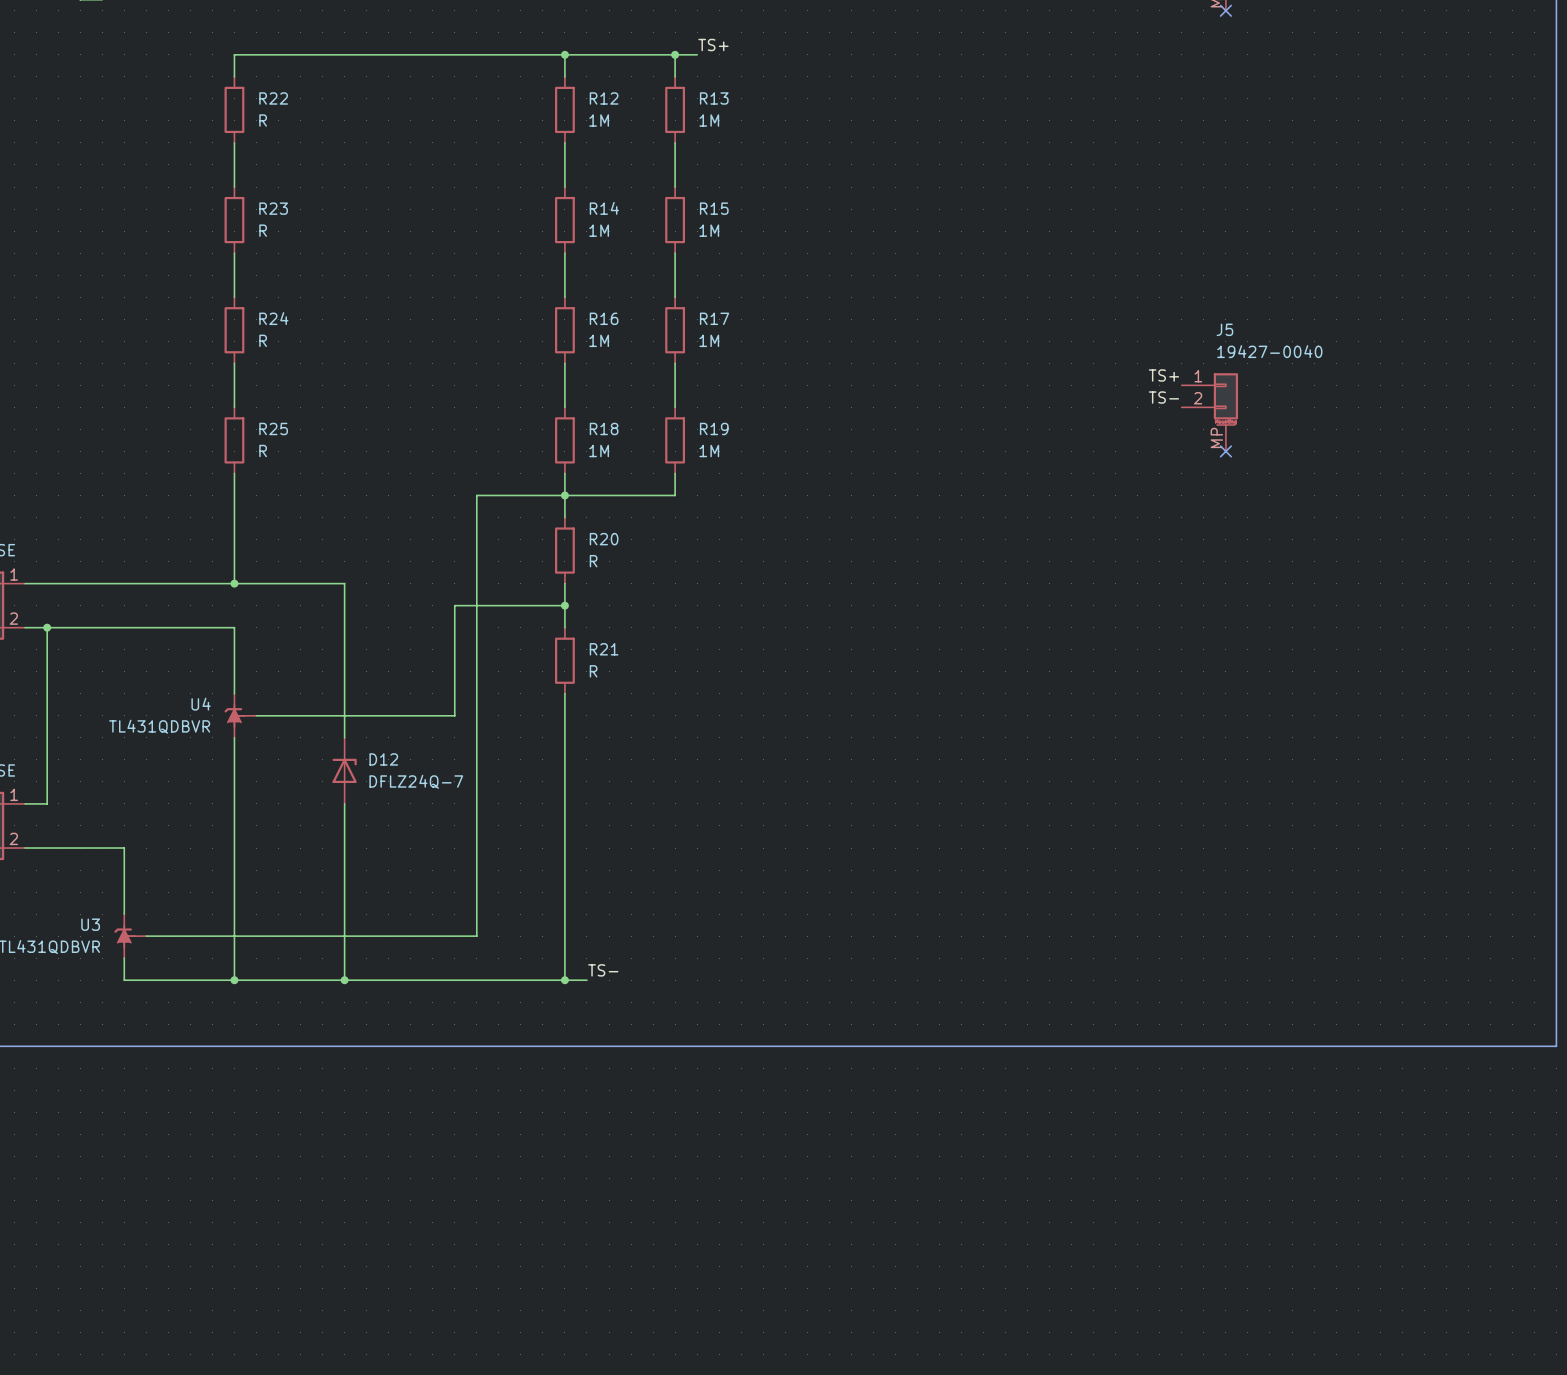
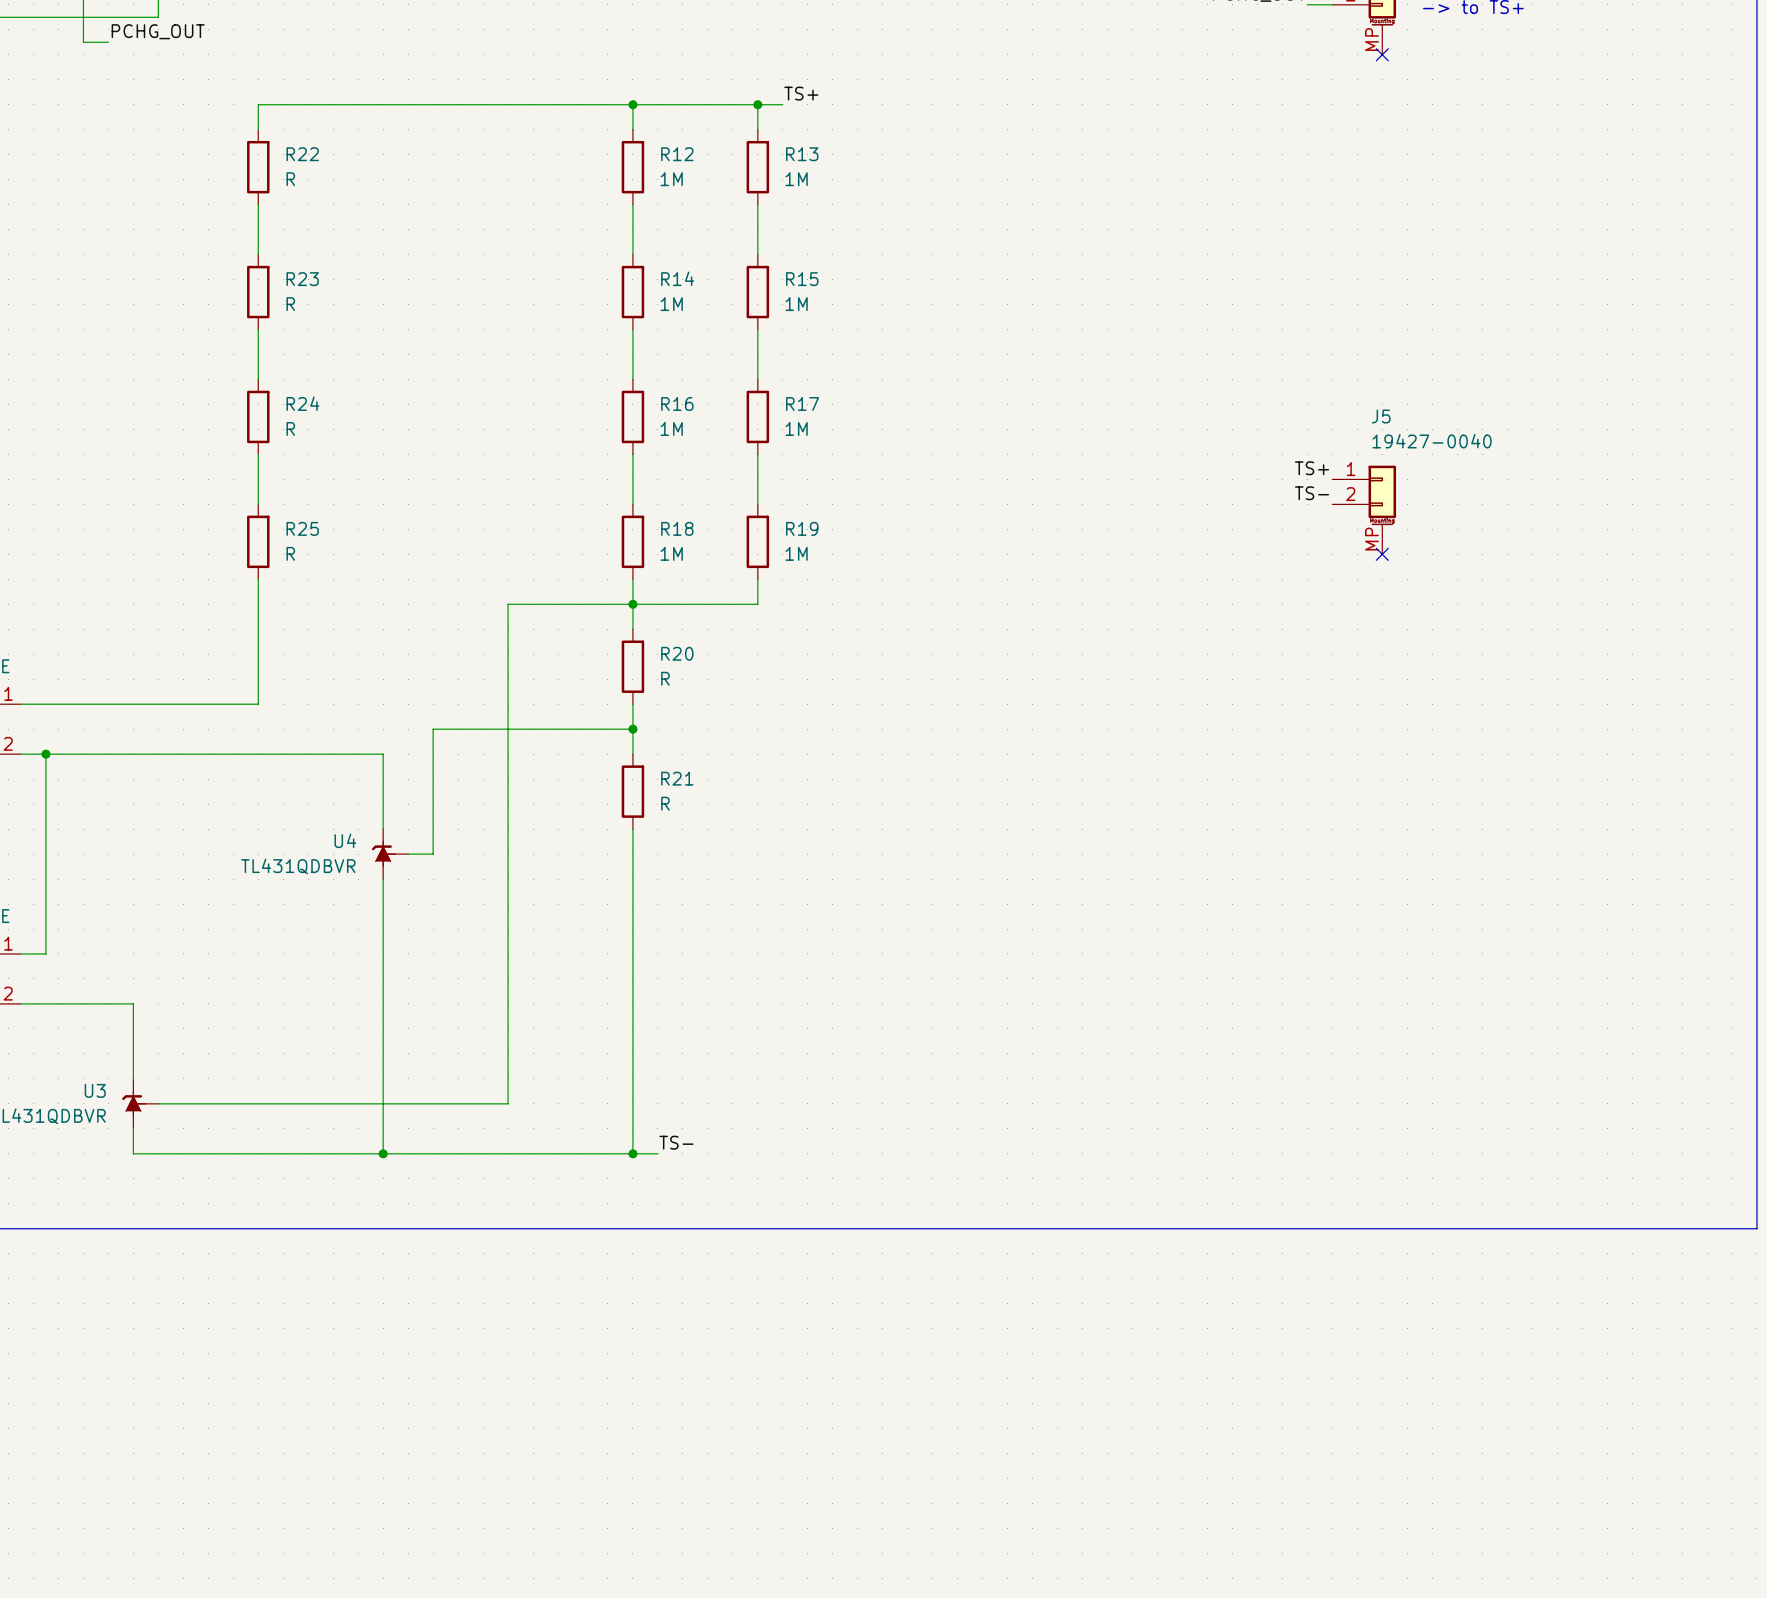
wire: (476, 495) (476, 936) (454, 936) -> (508, 854) (508, 1103)
wire: (234, 583) (344, 583) (344, 627) -> (258, 754) (383, 754)
junction: (234, 583) -> none
wire: (234, 627) (234, 693) -> none
U4 position: (240, 715) -> (390, 854)
wire: (256, 715) (366, 715) -> none
wire: (388, 715) (454, 715) -> (433, 854) (433, 729) (508, 729) (508, 604) (533, 604)
wire: (234, 737) (234, 980) -> none
D12: DFLZ24Q-7 (344, 770) -> none
junction: (234, 980) -> none

